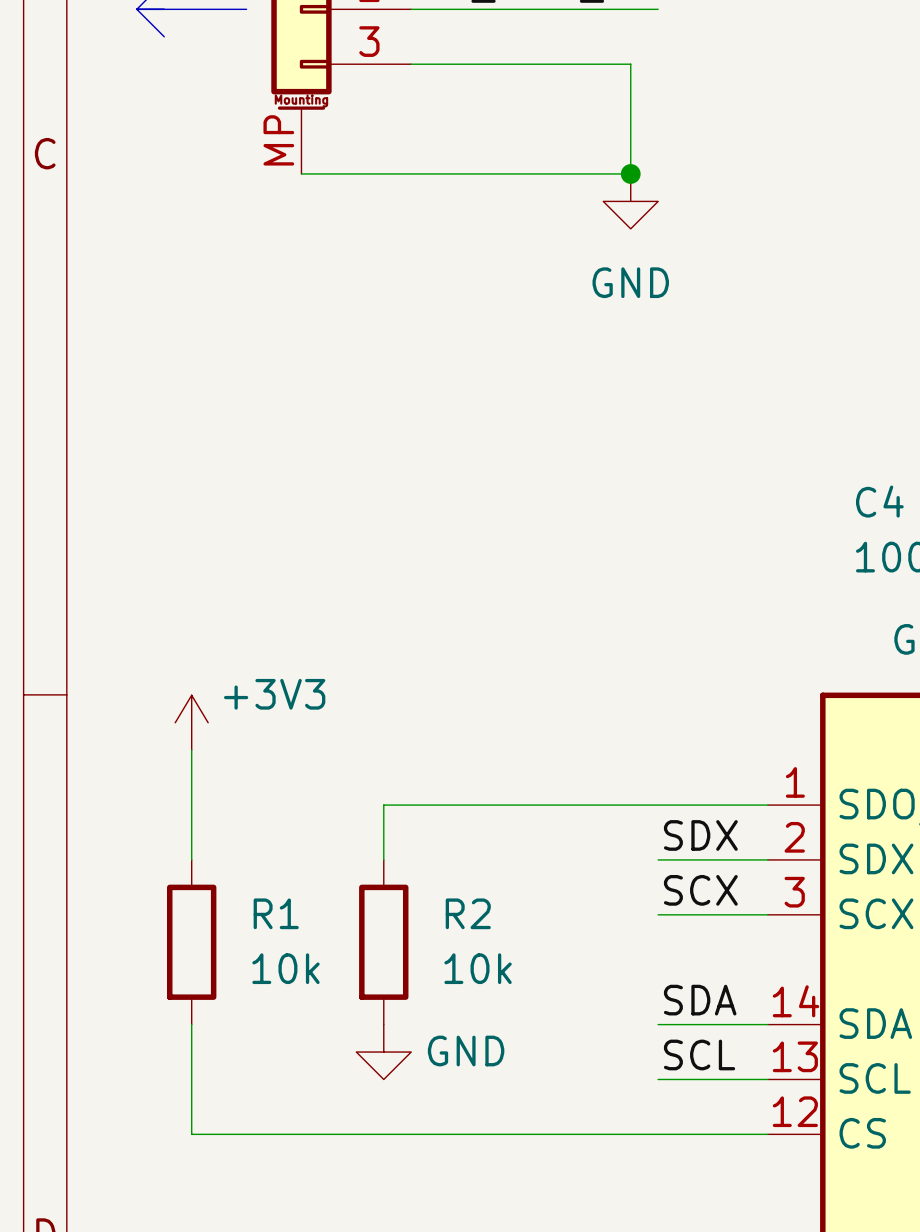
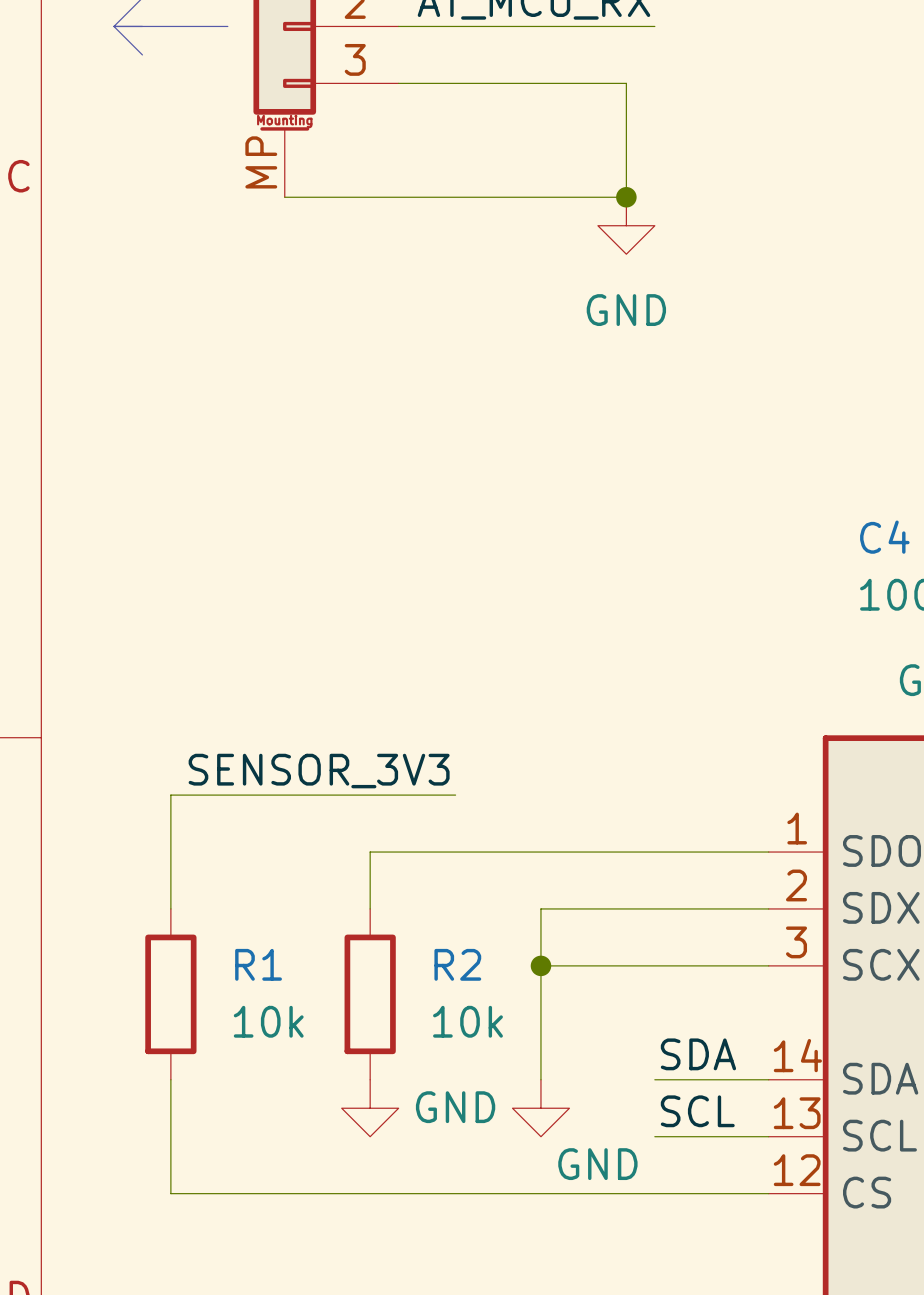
power symbol: +3V3 (191, 722) -> none
label: none -> SENSOR_3V3 (319, 771)
wire: none -> (170, 795) (455, 795)
label: SDX (700, 835) -> none
wire: none -> (654, 908) (540, 908) (540, 1079)
label: SCX (700, 890) -> none
wire: none -> (540, 965) (654, 965)
junction: none -> (540, 965)
power symbol: none -> GND (540, 1108)

